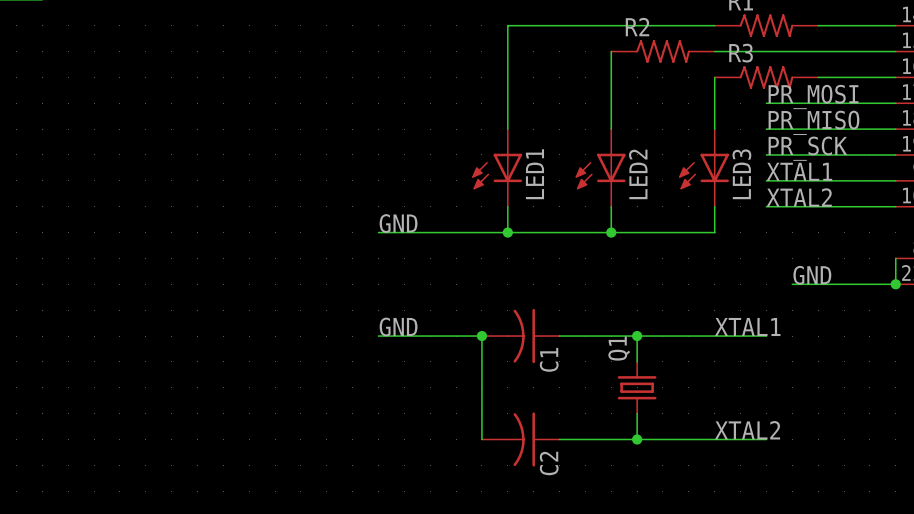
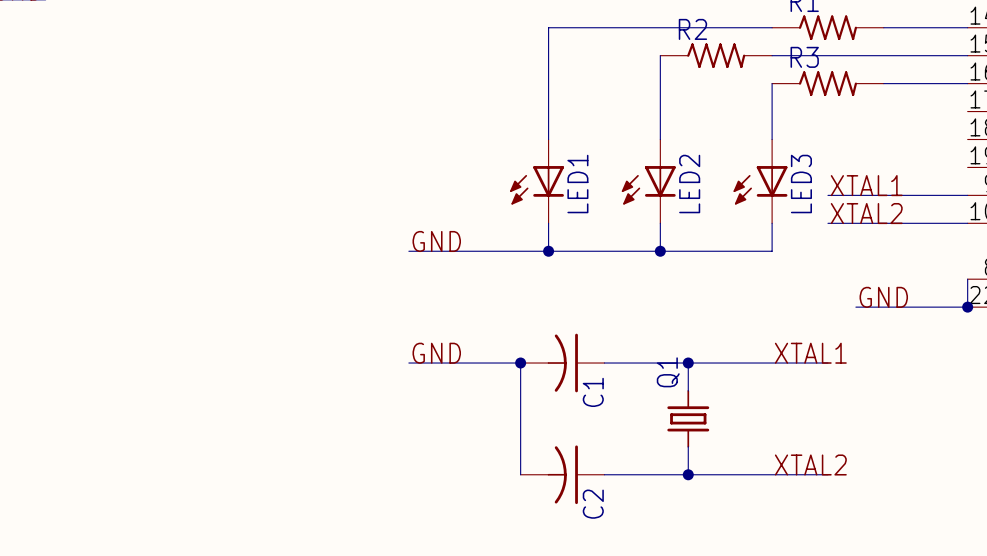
label: PR_MOSI (813, 96) -> none
wire: (766, 103) (895, 103) -> none
label: PR_MISO (813, 122) -> none
wire: (766, 129) (895, 129) -> none
label: PR_SCK (807, 148) -> none
wire: (766, 154) (895, 154) -> none

